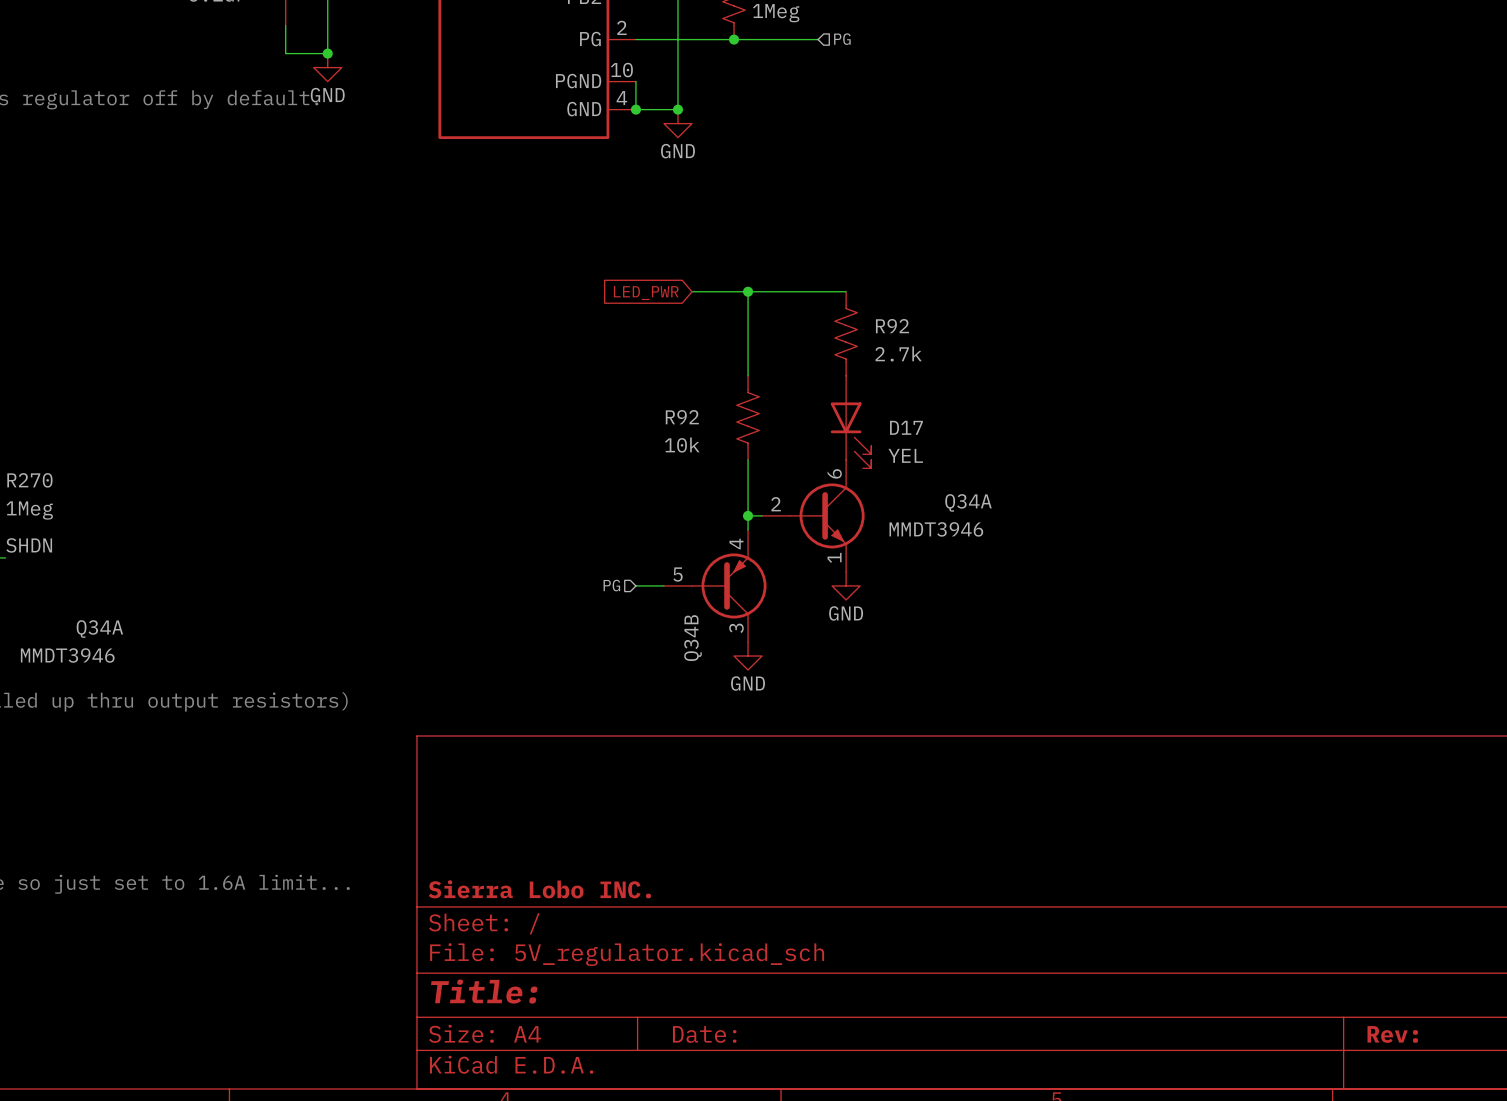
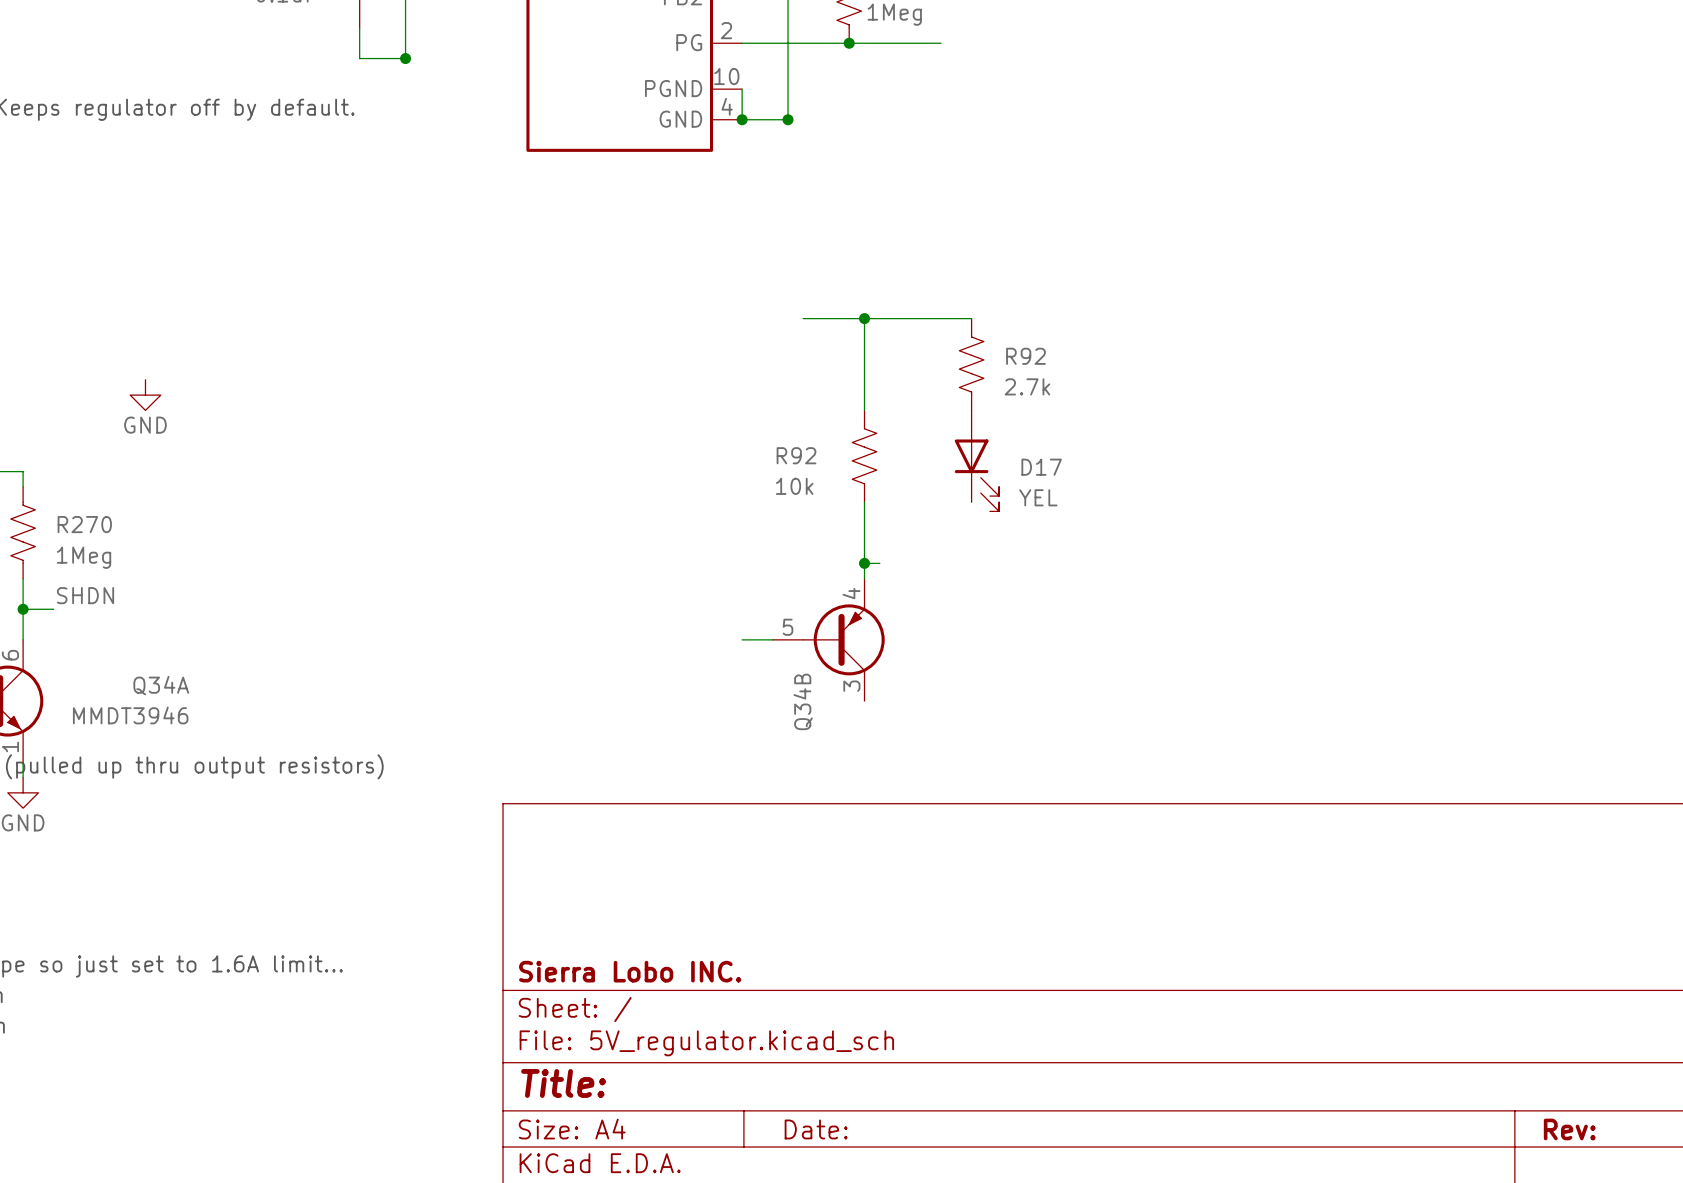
hierarchical label: PG (842, 39) -> none
power symbol: GND (327, 67) -> none
power symbol: GND (677, 123) -> none
global label: LED_PWR (646, 293) -> none
power symbol: none -> GND (145, 395)
Q34A: MMDT3946 (813, 515) -> none
hierarchical label: PG (611, 585) -> none
power symbol: GND (846, 585) -> none
power symbol: GND (748, 656) -> none

